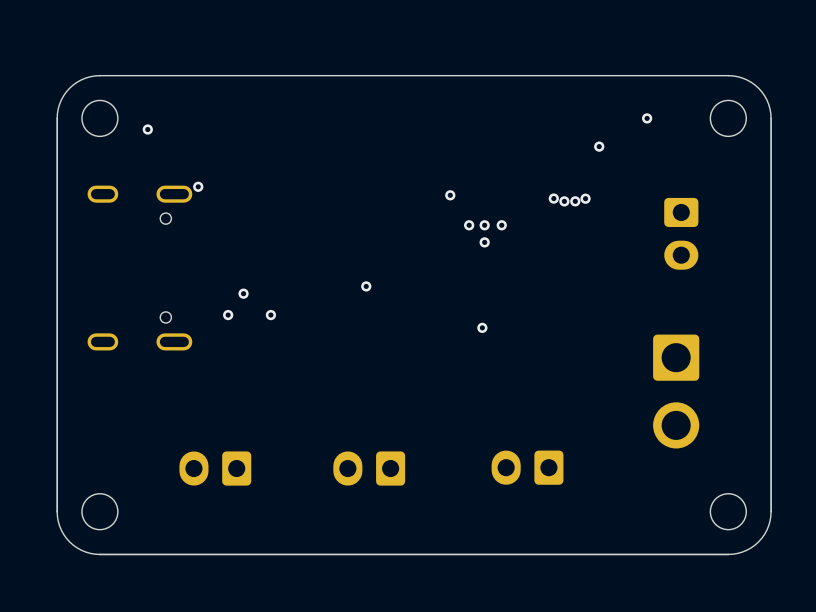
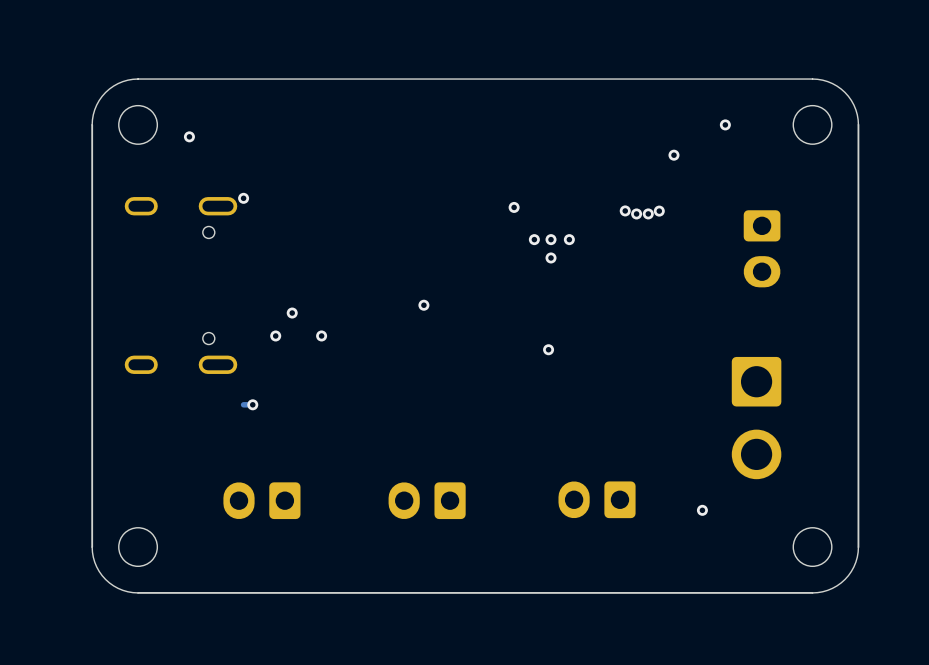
track: none -> (252, 404) (243, 404)
via: none -> (252, 404)
via: none -> (702, 510)

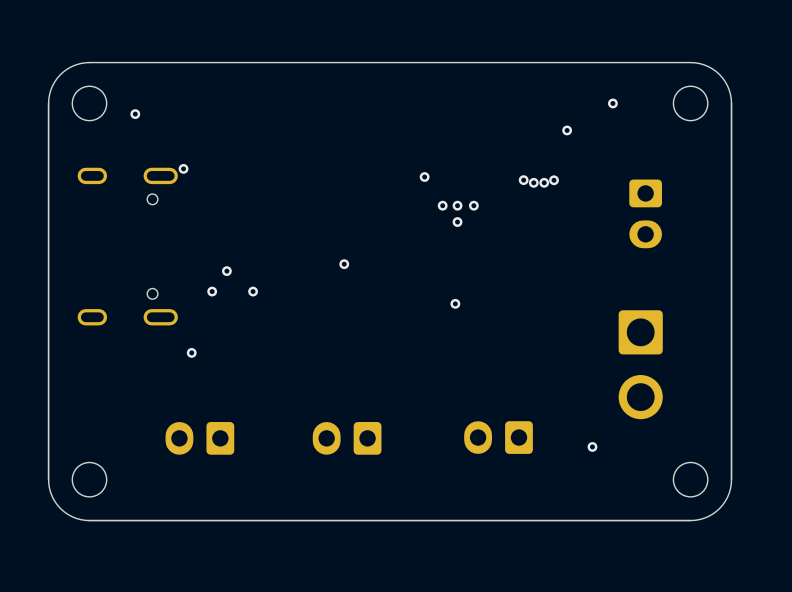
track: (252, 404) (243, 404) -> none

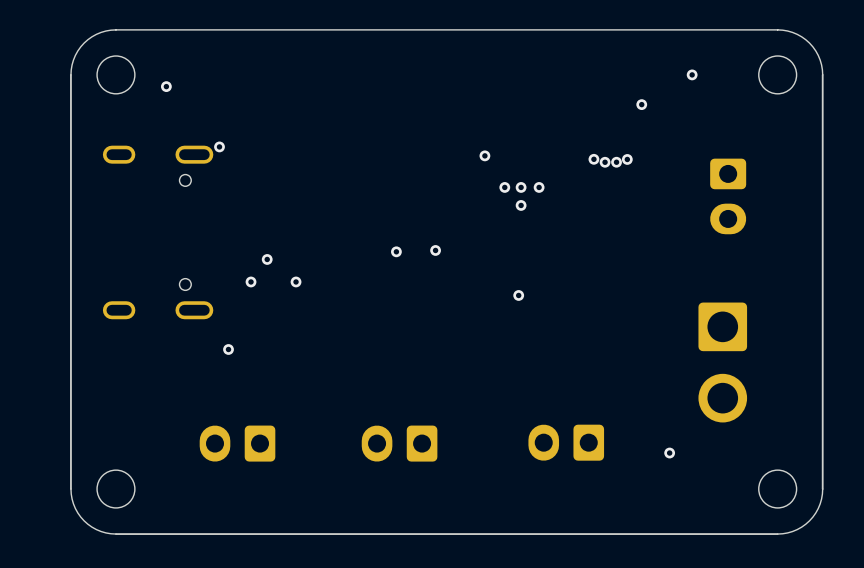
via: none -> (435, 250)

